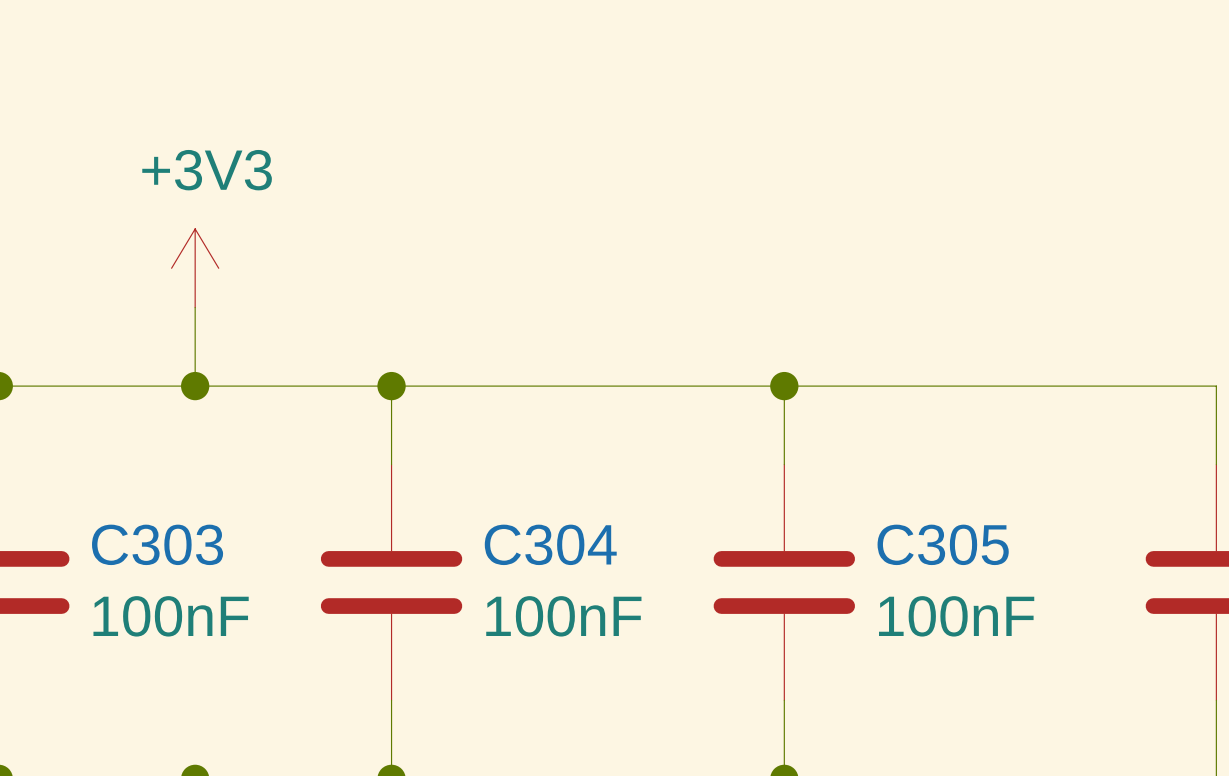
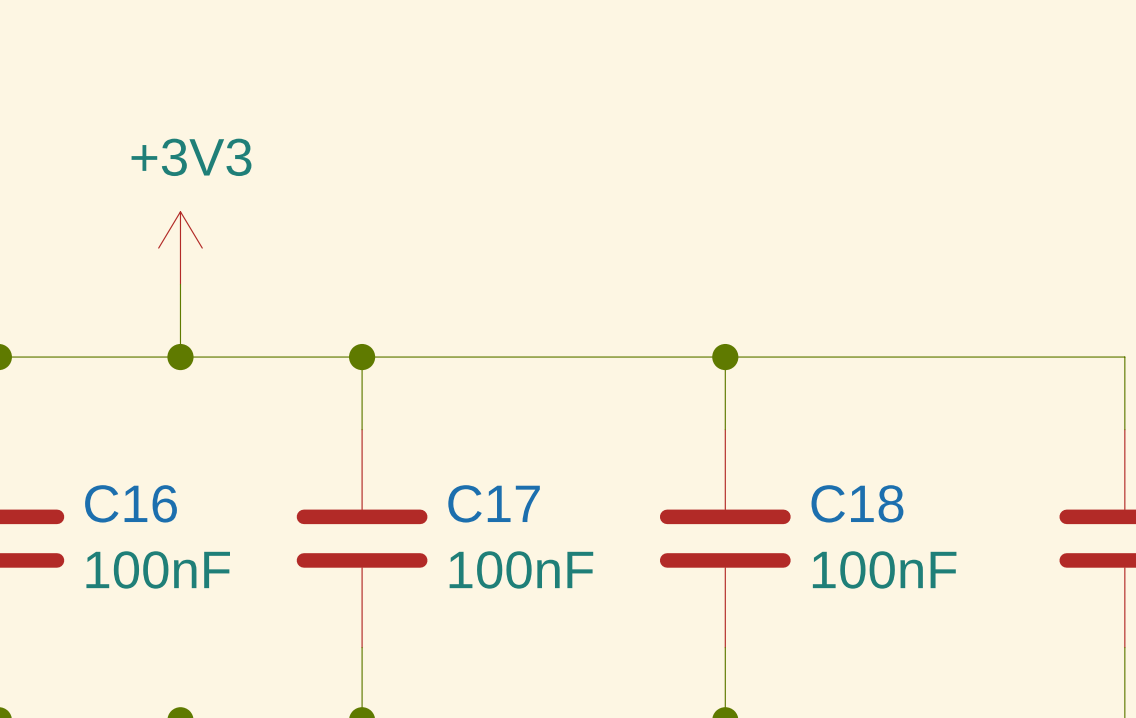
C303 name: C303 (157, 544) -> C16 (131, 503)
C304 name: C304 (550, 544) -> C17 (494, 503)
C305 name: C305 (943, 544) -> C18 (857, 503)

